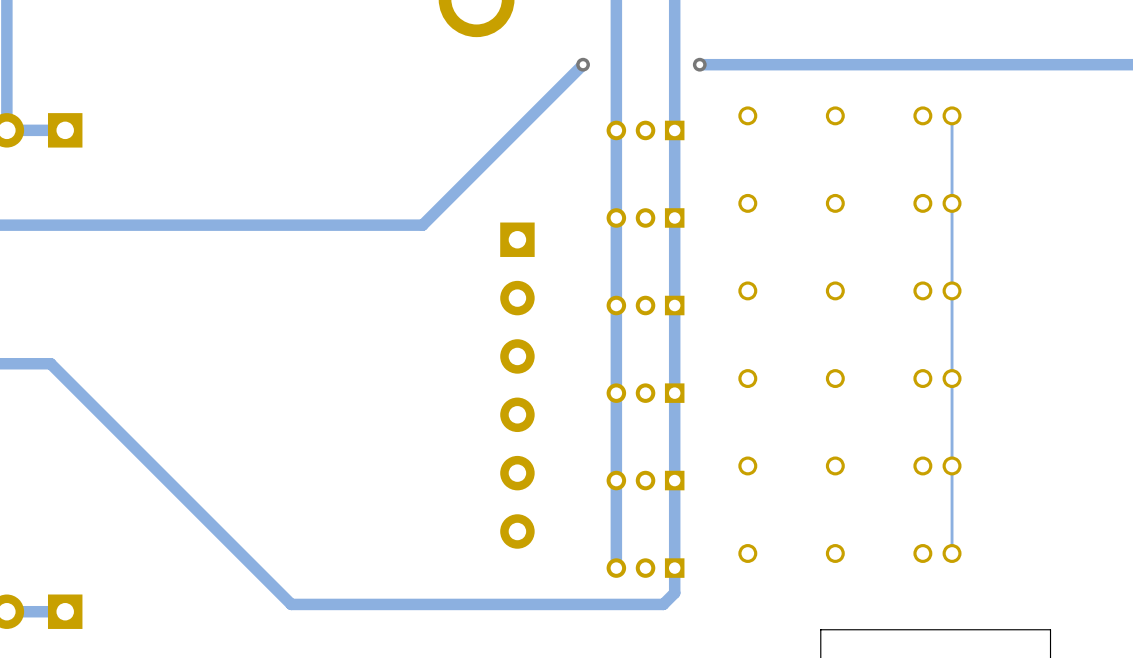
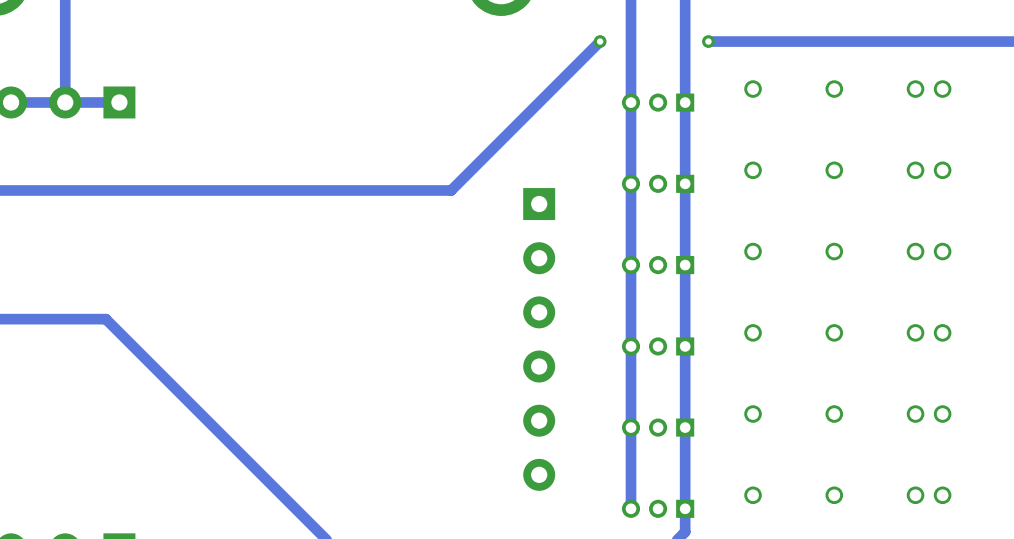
track: (952, 115) (952, 553) -> none

